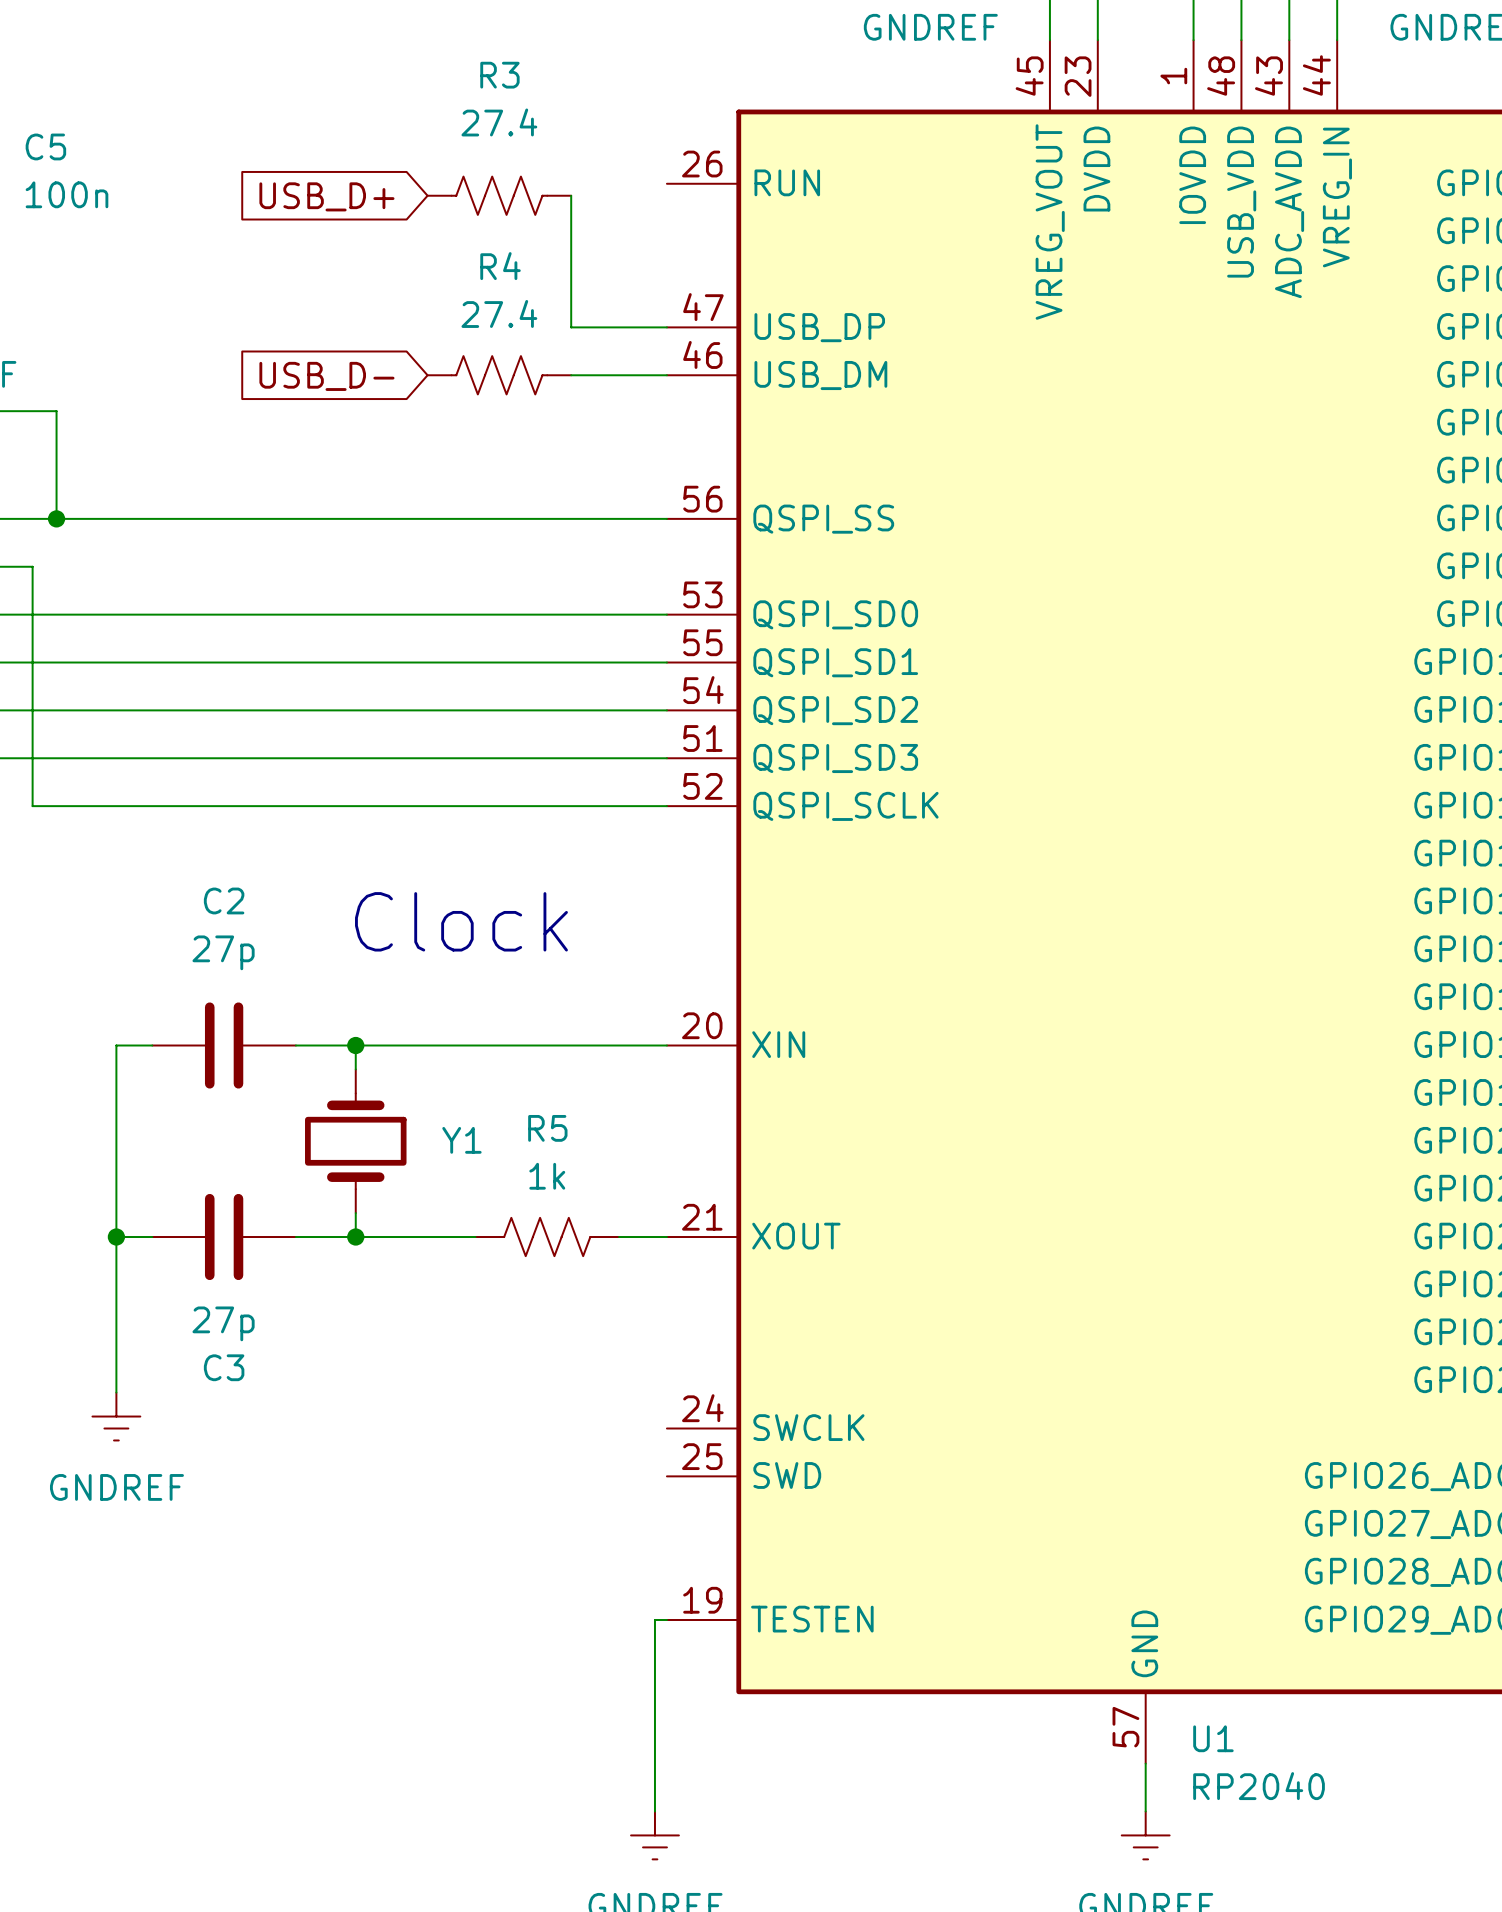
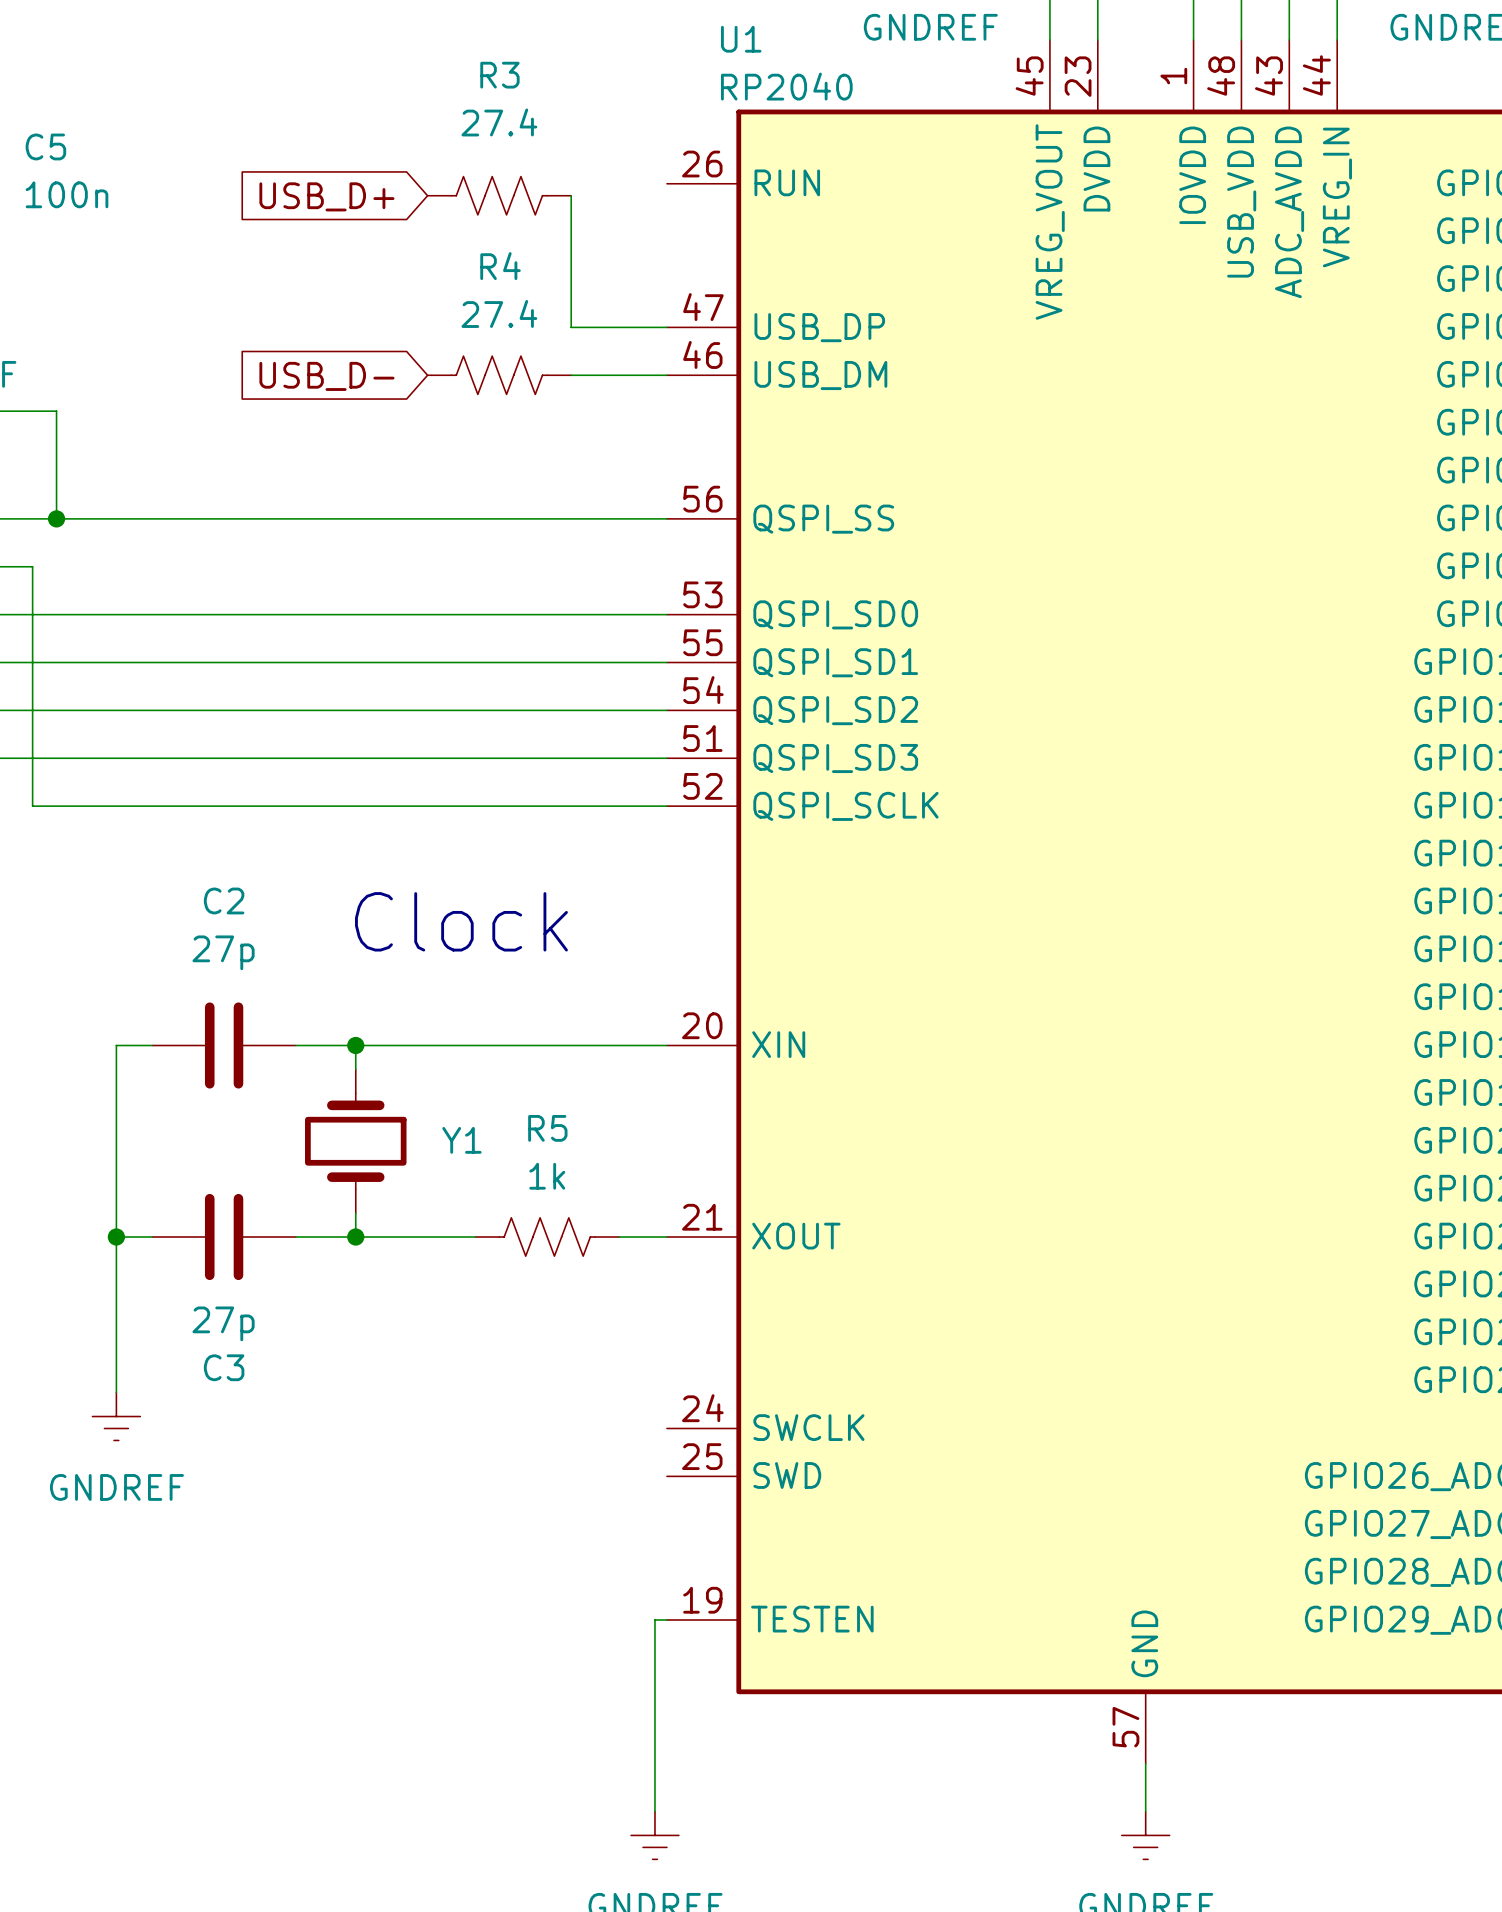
U1 name position: U1 (1213, 1738) -> U1 (741, 39)
U1 value position: RP2040 (1259, 1786) -> RP2040 (786, 86)

